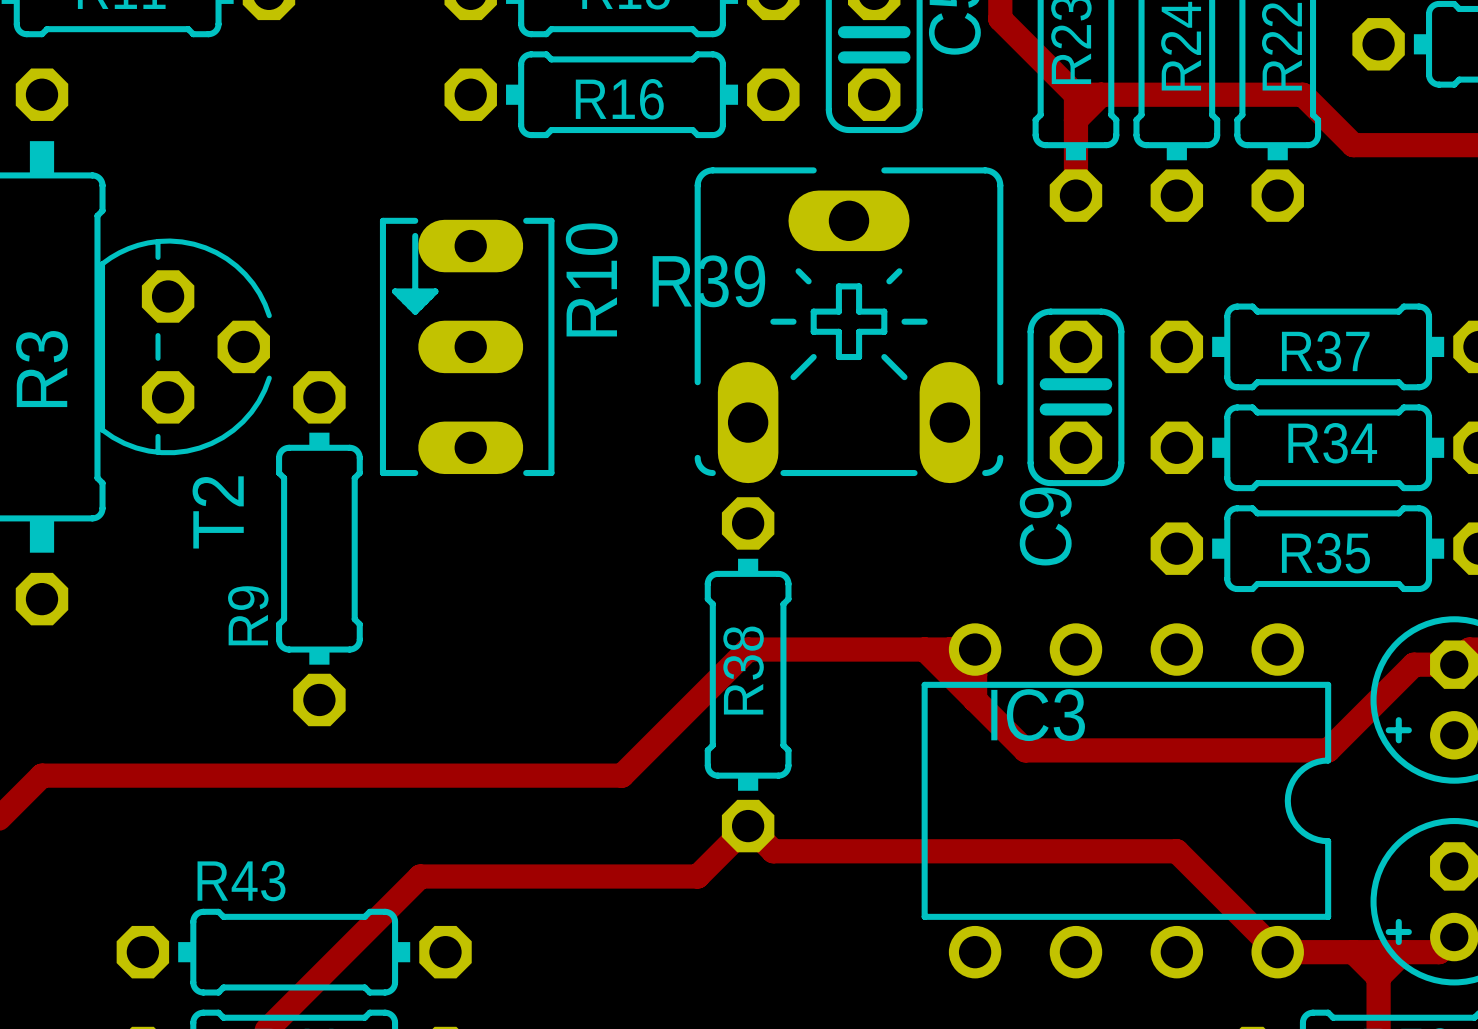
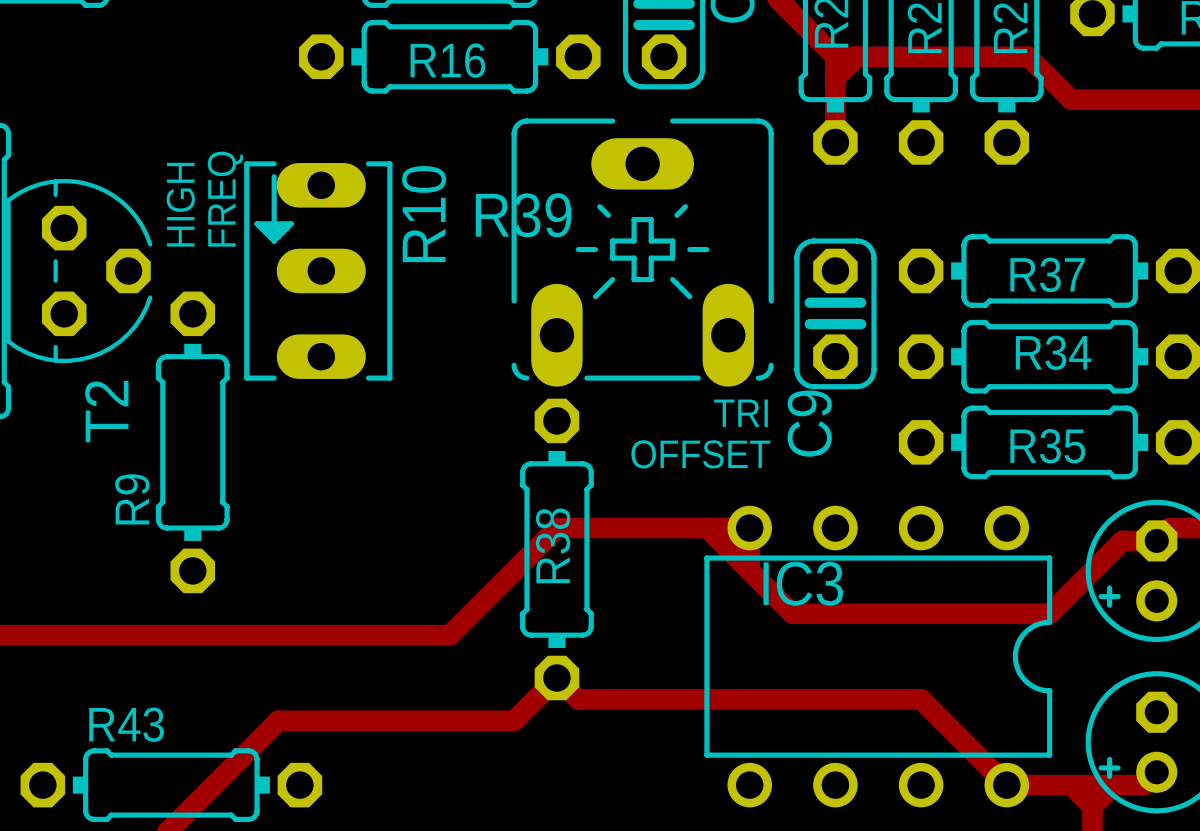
text: none -> FREQ (225, 199)
text: none -> HIGH (180, 204)
text: none -> TRI (741, 413)
text: none -> OFFSET (700, 454)

